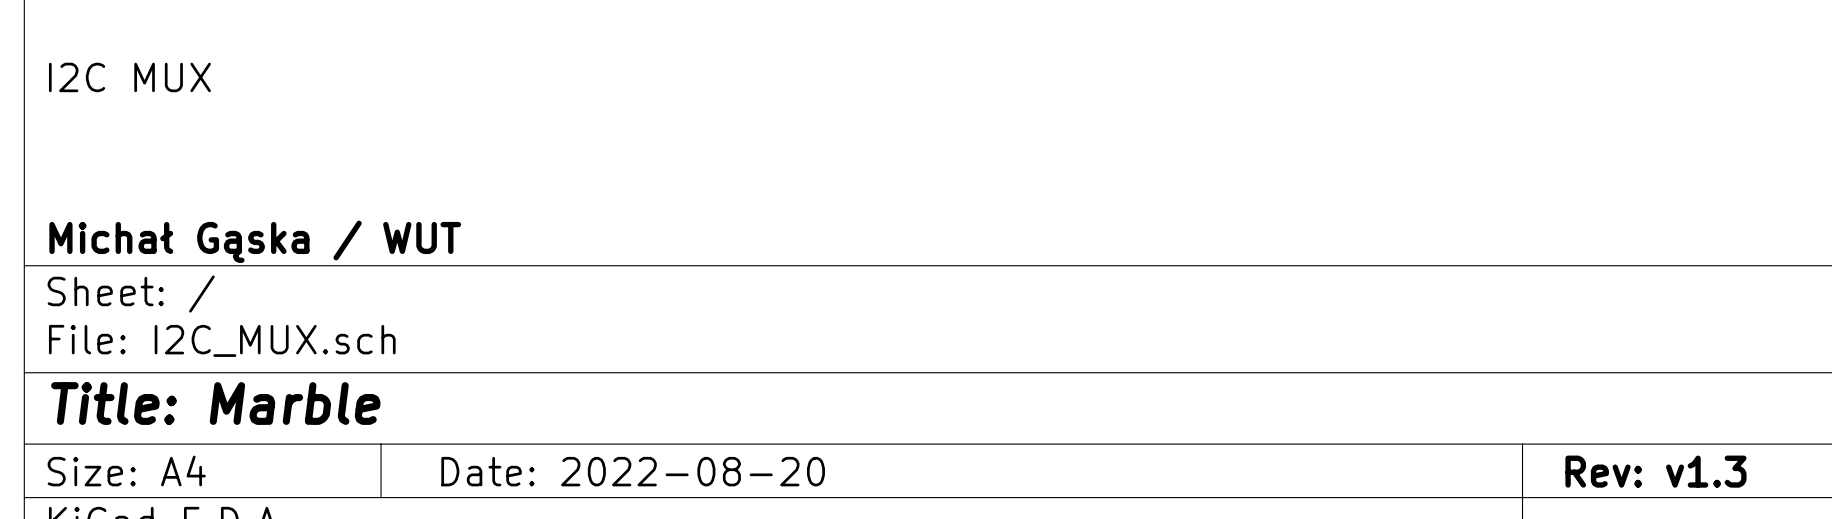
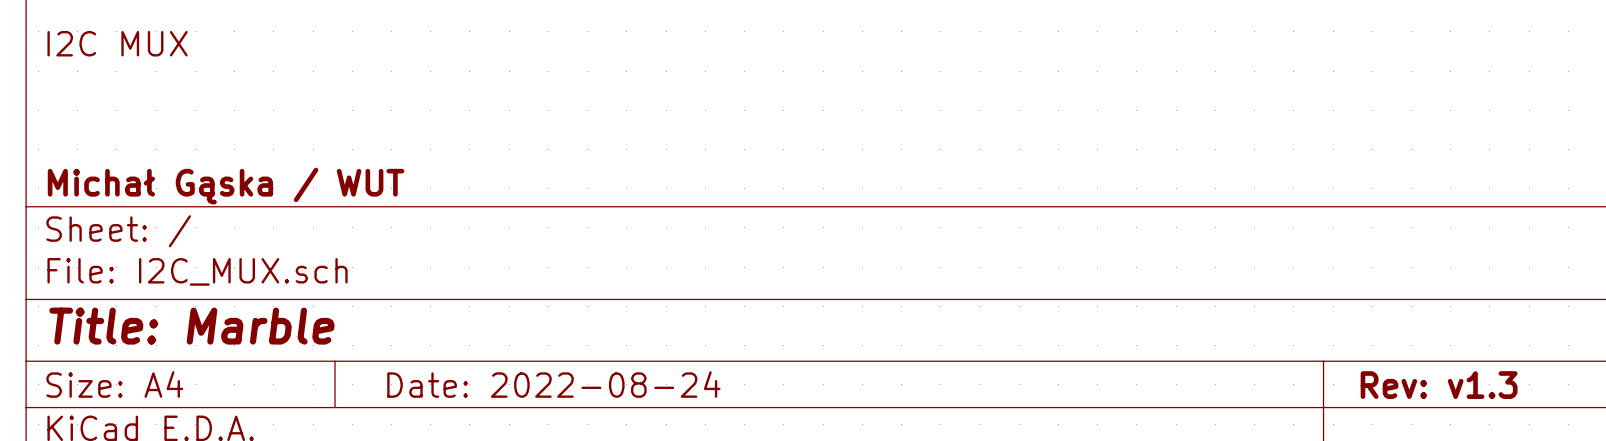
title block: Date: 2022-08-20 (633, 471) -> Date: 2022-08-24 (553, 384)

